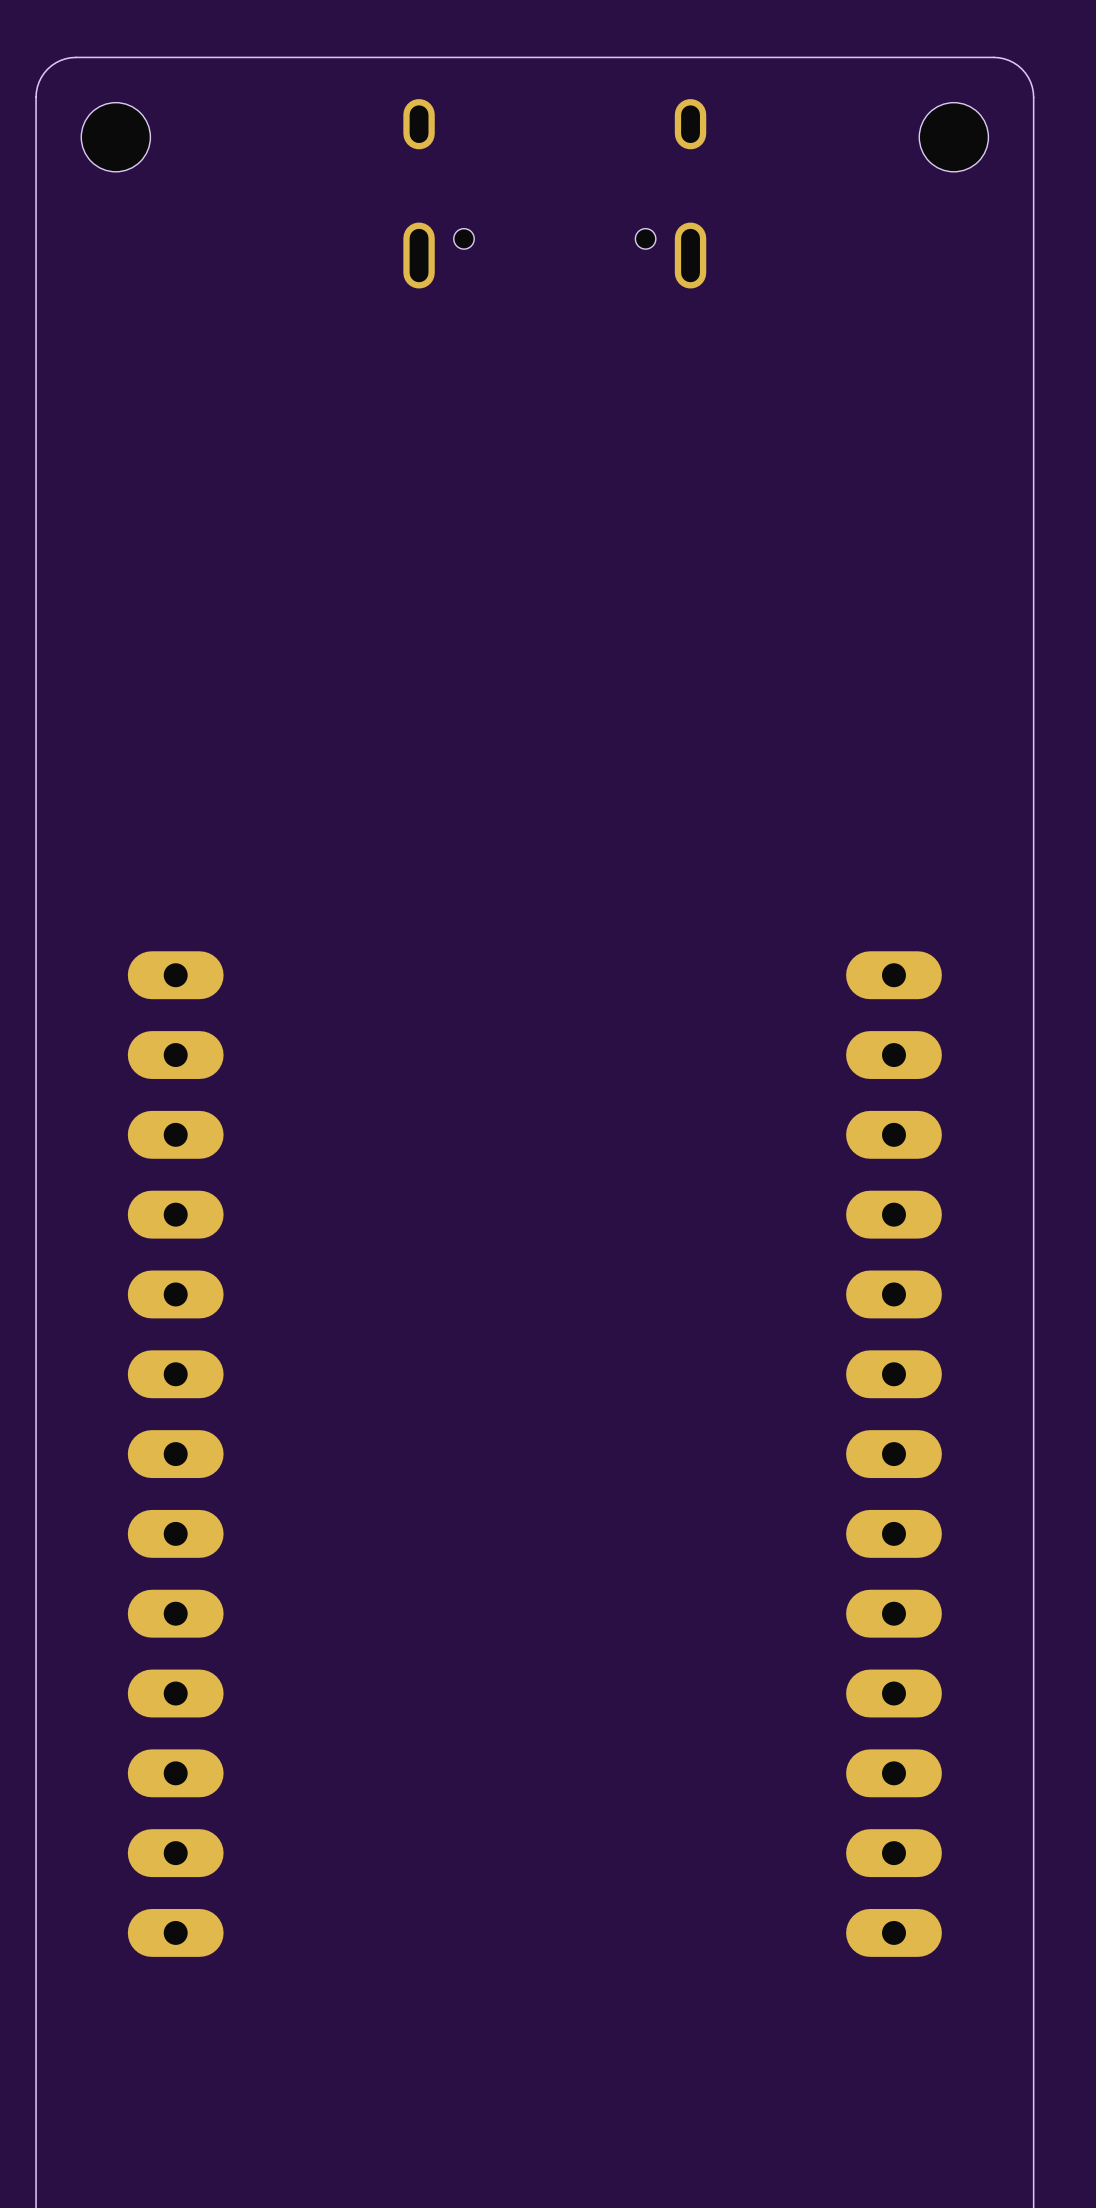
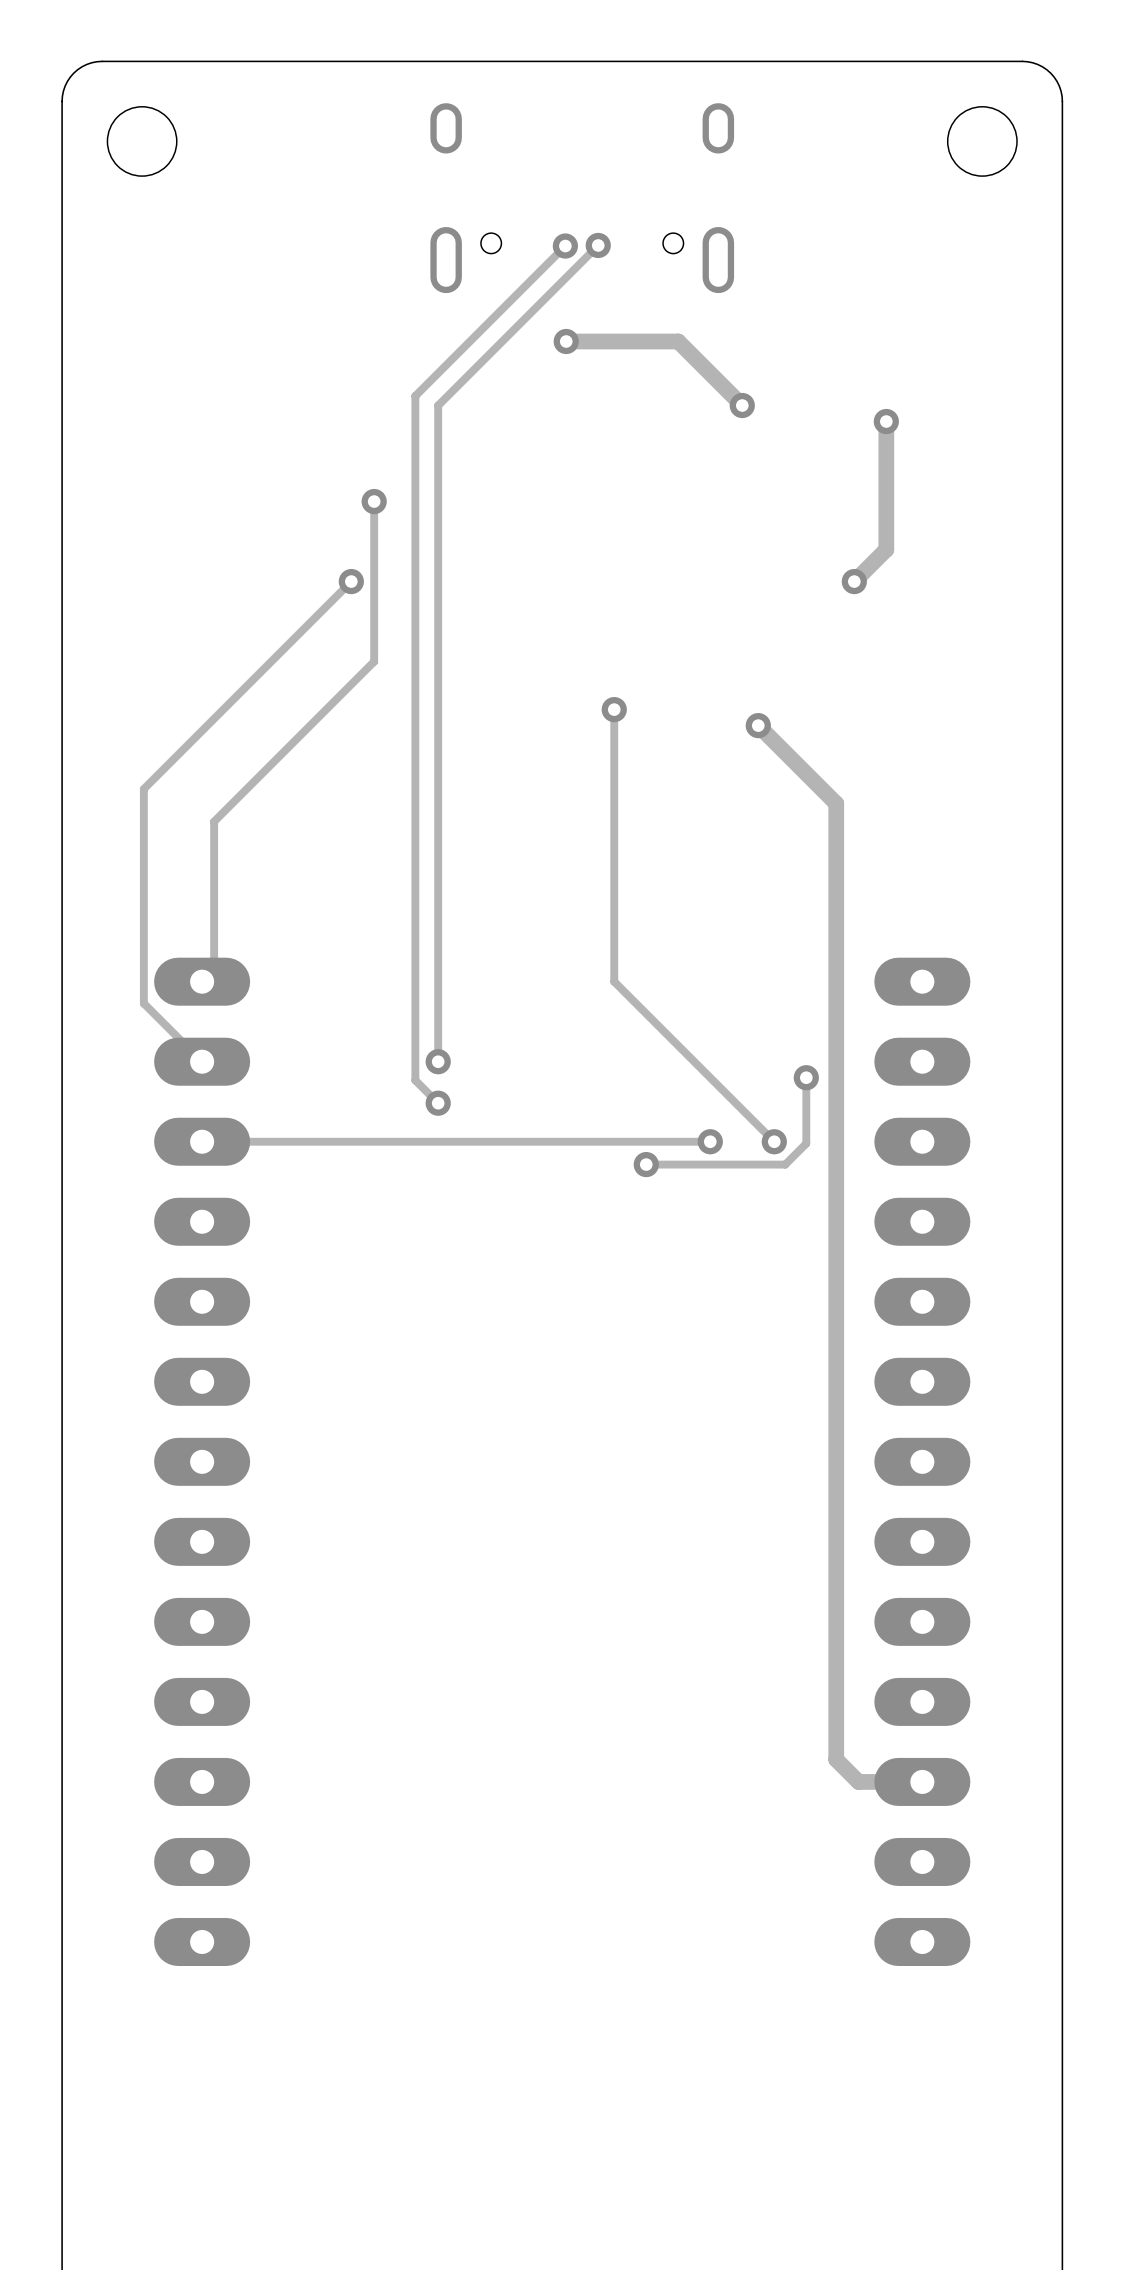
track: none -> (598, 245) (438, 405) (438, 1061)
via: none -> (598, 245)
track: none -> (565, 246) (415, 396) (415, 1080) (438, 1103)
via: none -> (565, 246)
track: none -> (566, 341) (678, 341) (742, 405)
via: none -> (566, 341)
via: none -> (742, 405)
track: none -> (886, 421) (886, 549) (854, 581)
via: none -> (886, 421)
track: none -> (374, 501) (374, 661) (214, 821) (214, 969) (202, 981)
via: none -> (374, 501)
track: none -> (351, 581) (143, 789) (143, 1003) (202, 1061)
via: none -> (351, 581)
via: none -> (854, 581)
track: none -> (614, 709) (614, 981) (774, 1141)
via: none -> (614, 709)
track: none -> (758, 725) (836, 803) (836, 1759) (858, 1781) (922, 1781)
via: none -> (758, 725)
via: none -> (438, 1061)
track: none -> (806, 1077) (806, 1143) (785, 1164) (646, 1164)
via: none -> (806, 1077)
via: none -> (438, 1103)
track: none -> (710, 1141) (202, 1141)
via: none -> (710, 1141)
via: none -> (774, 1141)
via: none -> (646, 1164)

